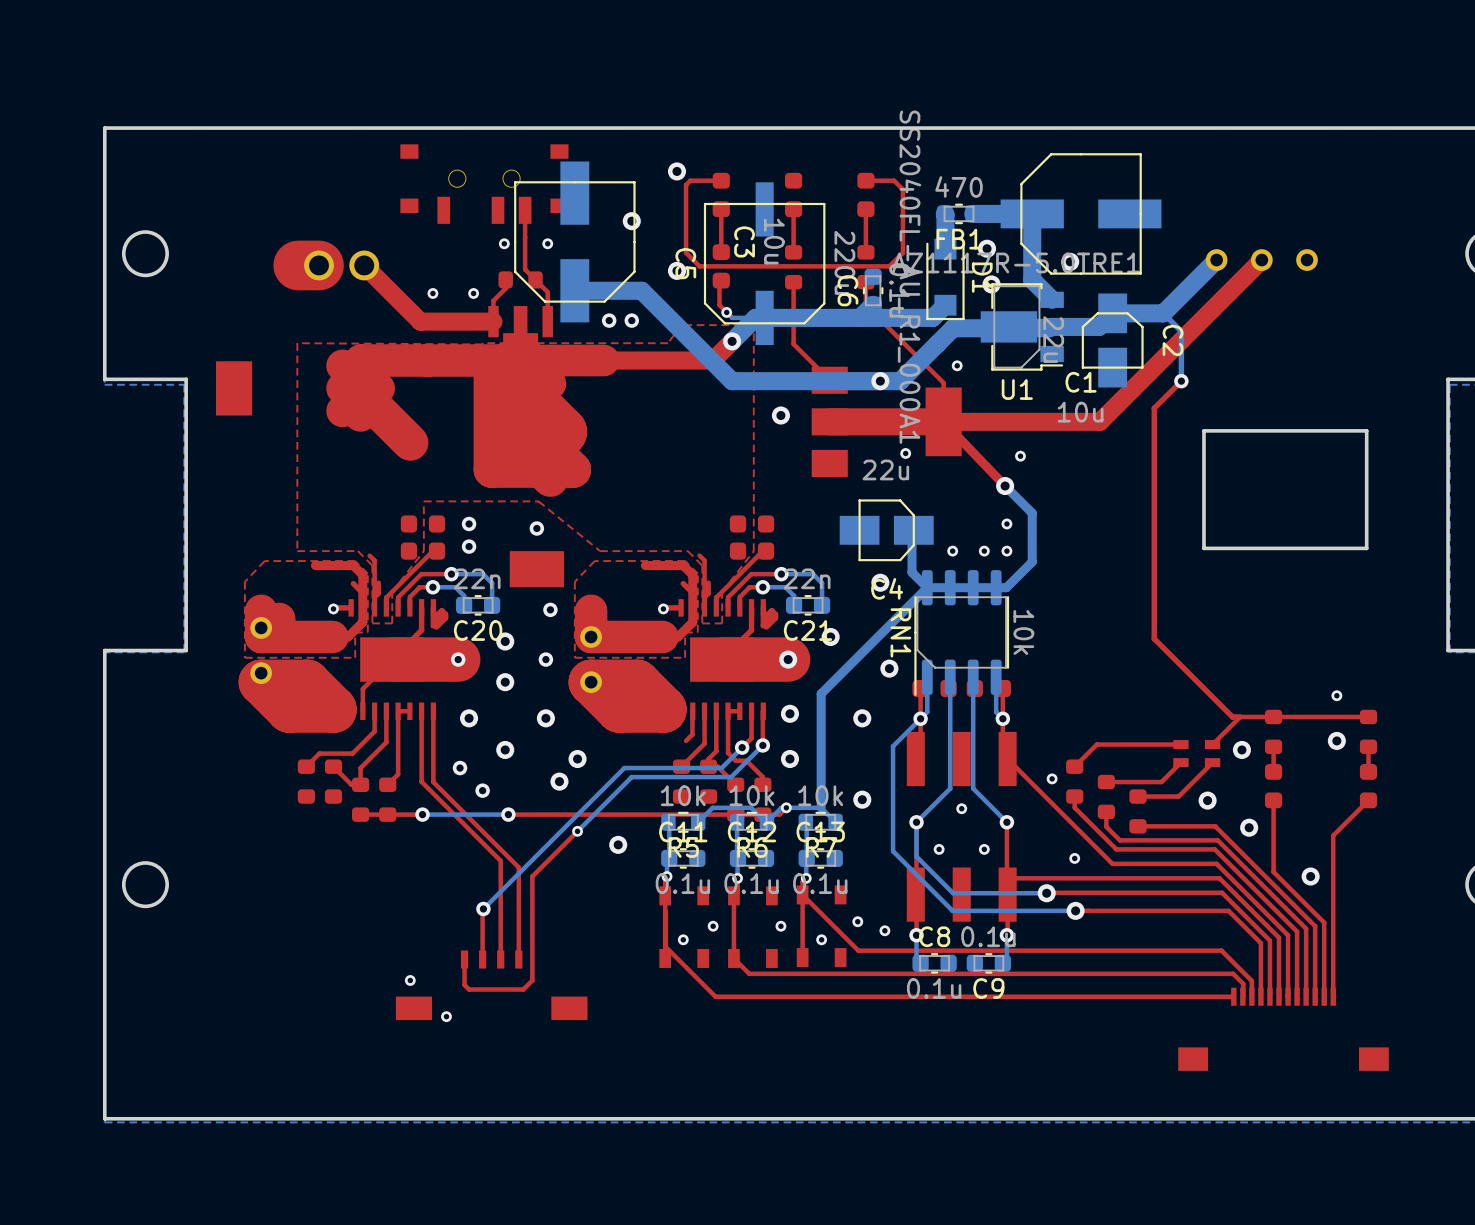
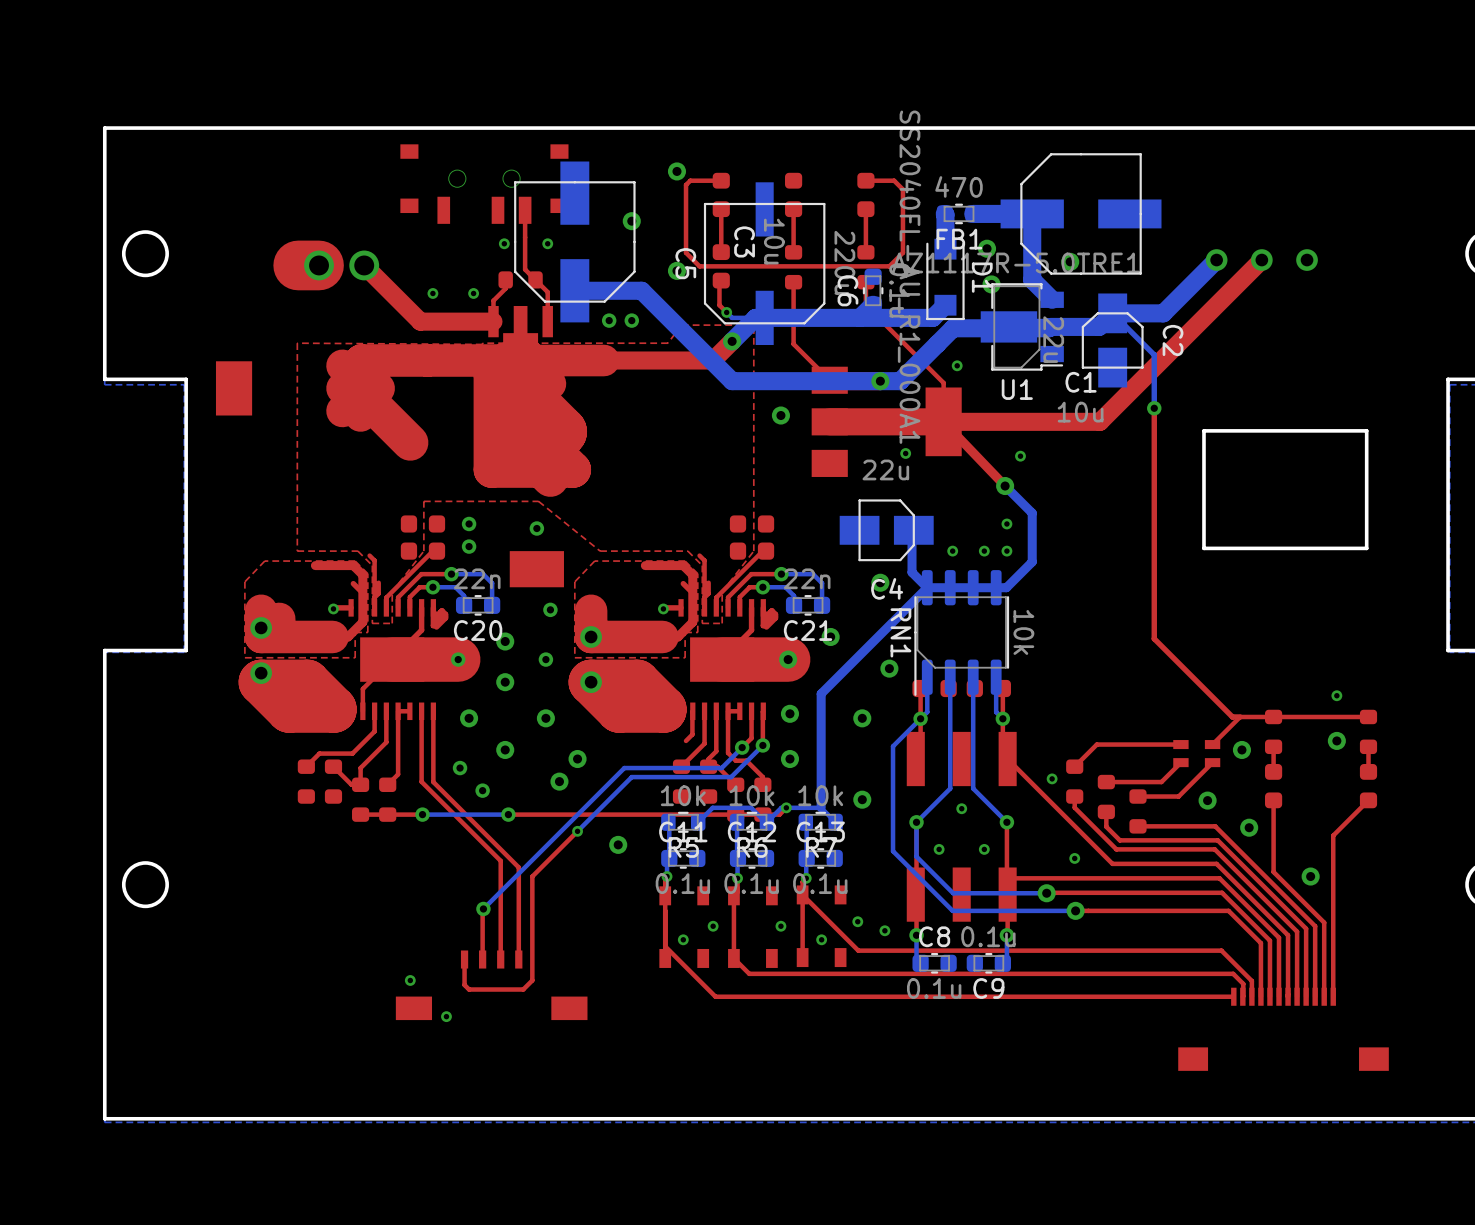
bottom track: none -> (1112, 313) (1154, 354) (1154, 408)
bottom track: (1163, 313) (1181, 331) (1181, 381) -> none
top track: (1181, 381) (1154, 408) -> none
via position: (1181, 381) -> (1154, 408)

